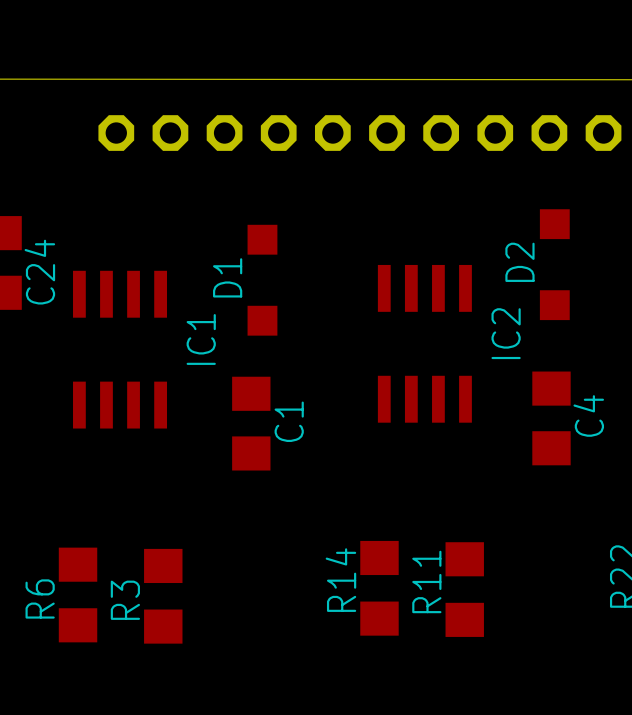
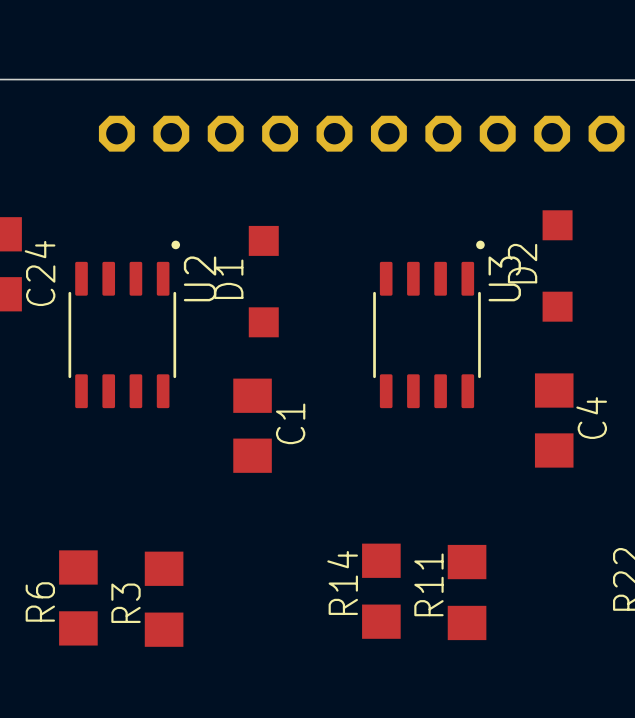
U2: none -> (124, 324)
U3: none -> (428, 324)
IC2: (424, 343) -> none
IC1: (120, 349) -> none

